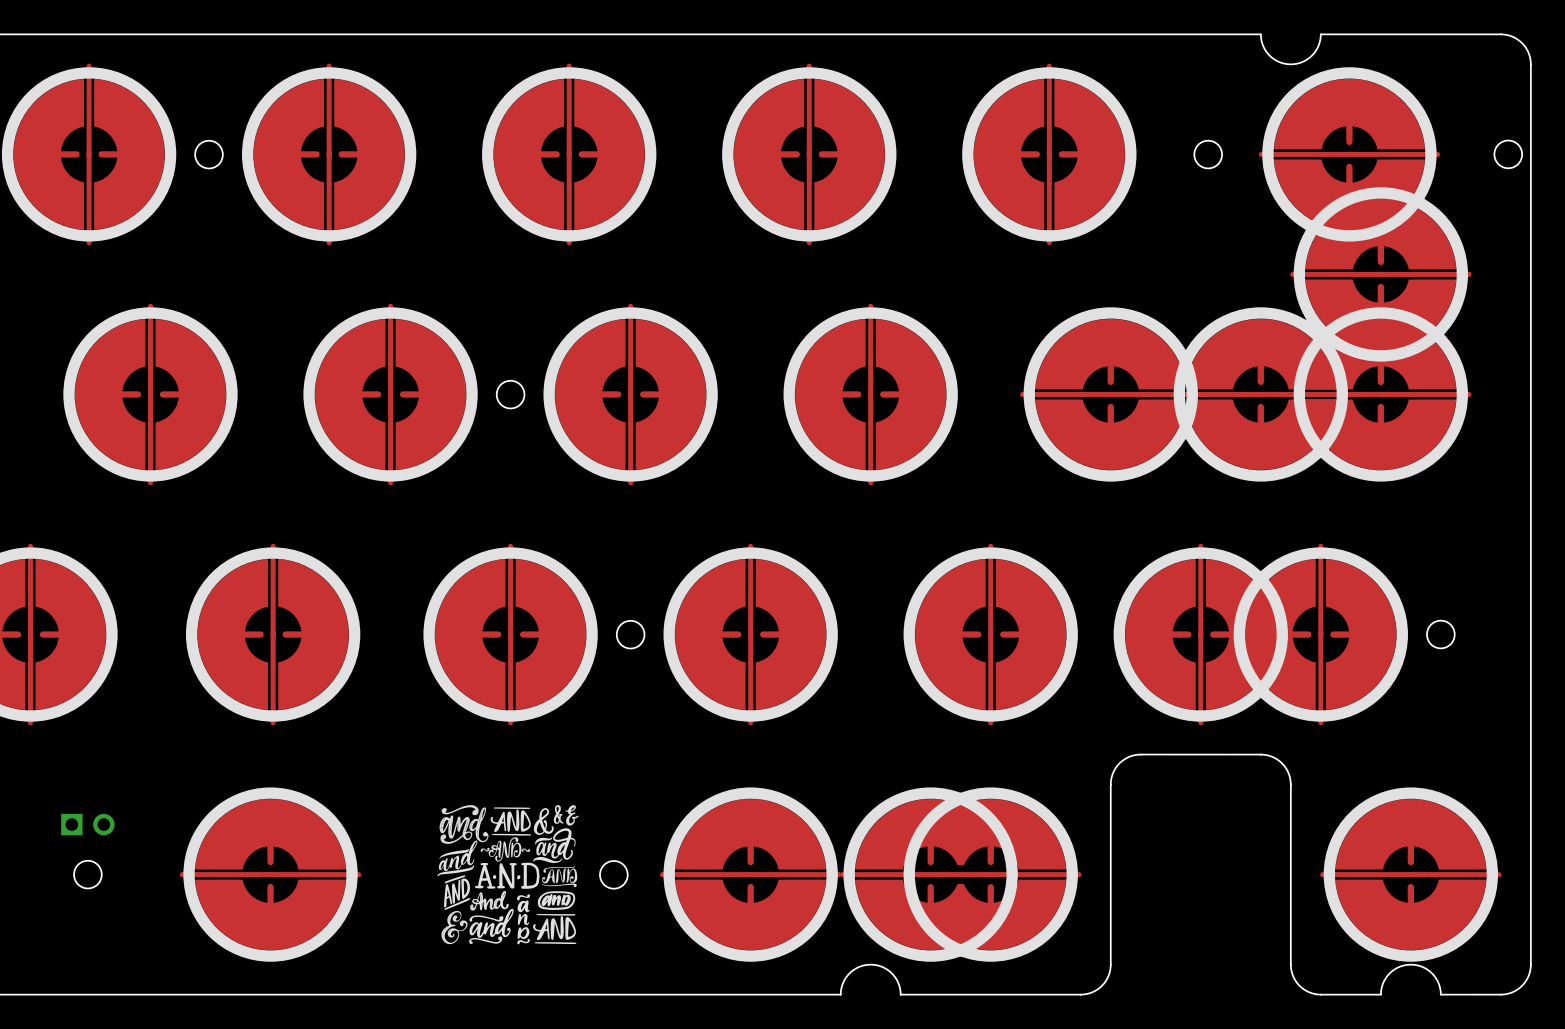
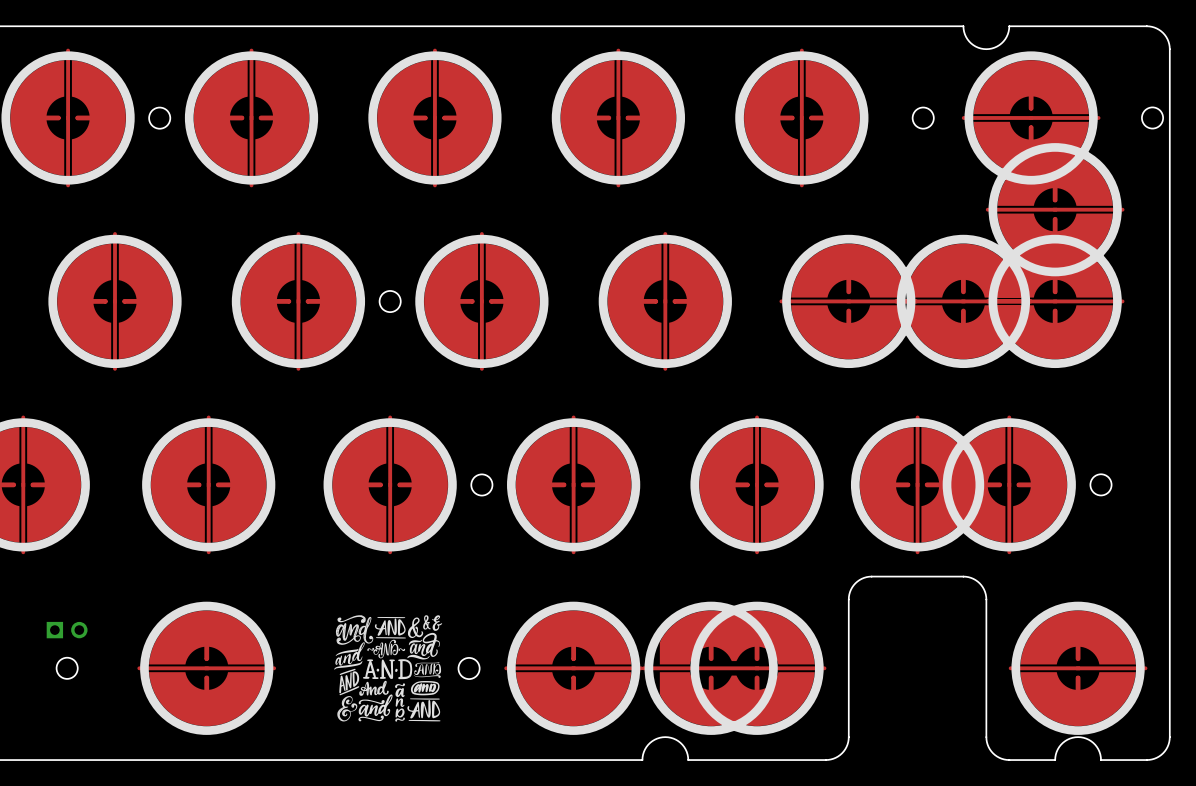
part footprint: [839, 787, 1082, 962] -> [641, 601, 827, 735]

